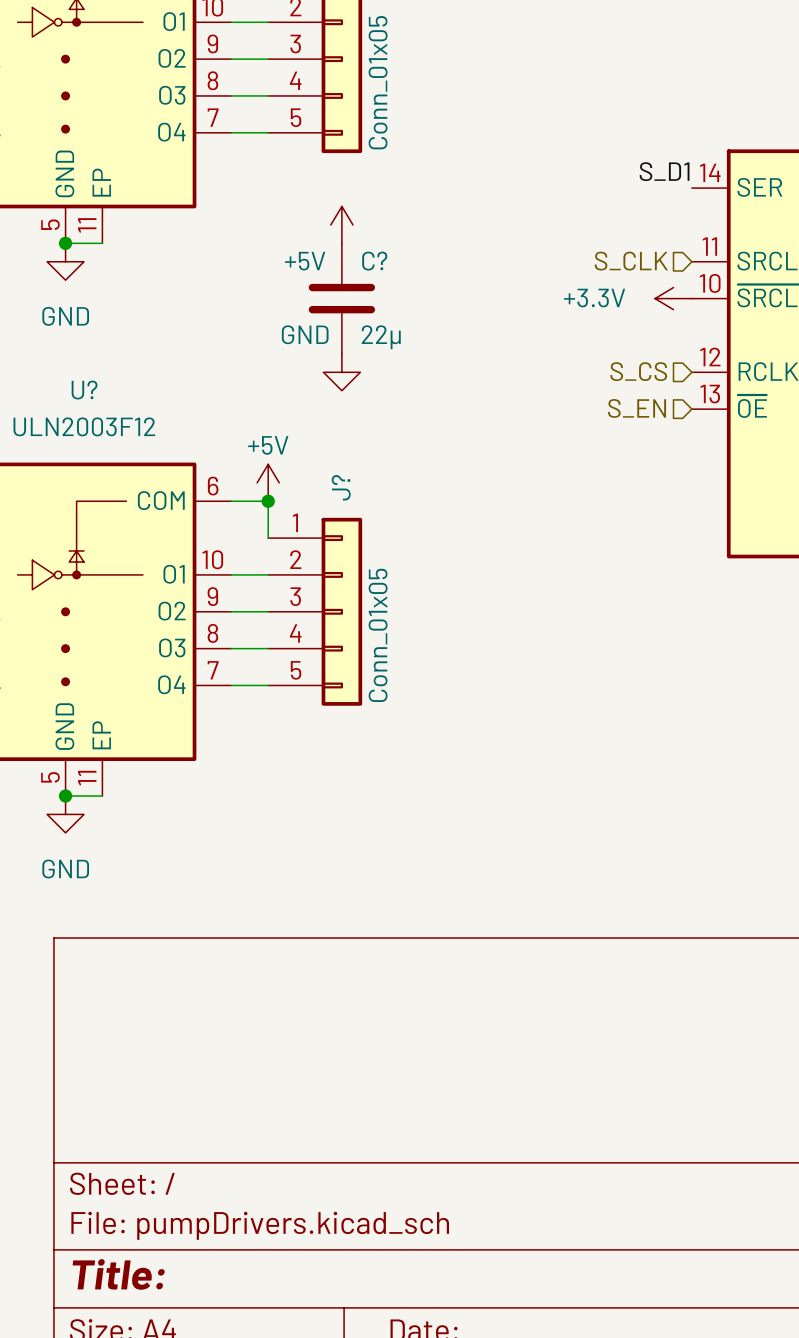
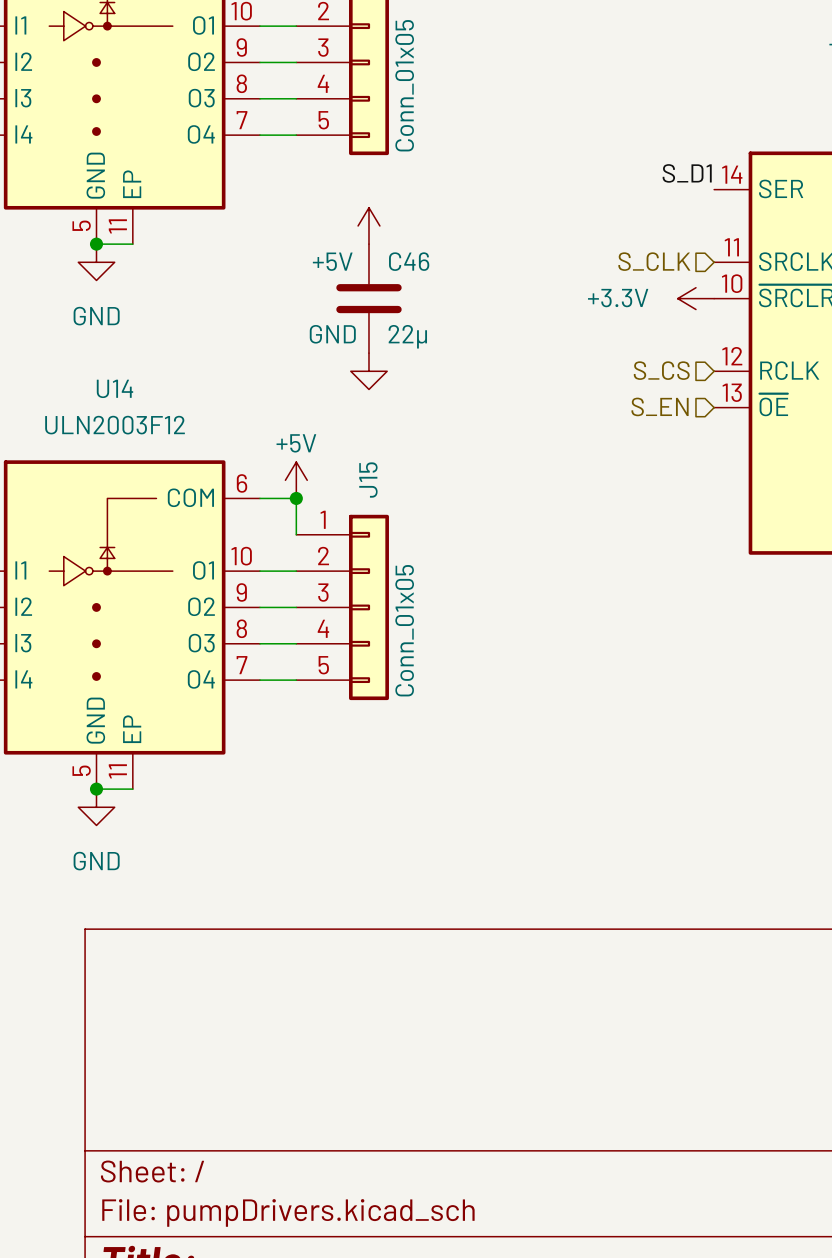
C? name: C? (374, 261) -> C46 (409, 261)
U? name: U? (84, 390) -> U14 (114, 388)
J? name: J? (341, 487) -> J15 (368, 480)

